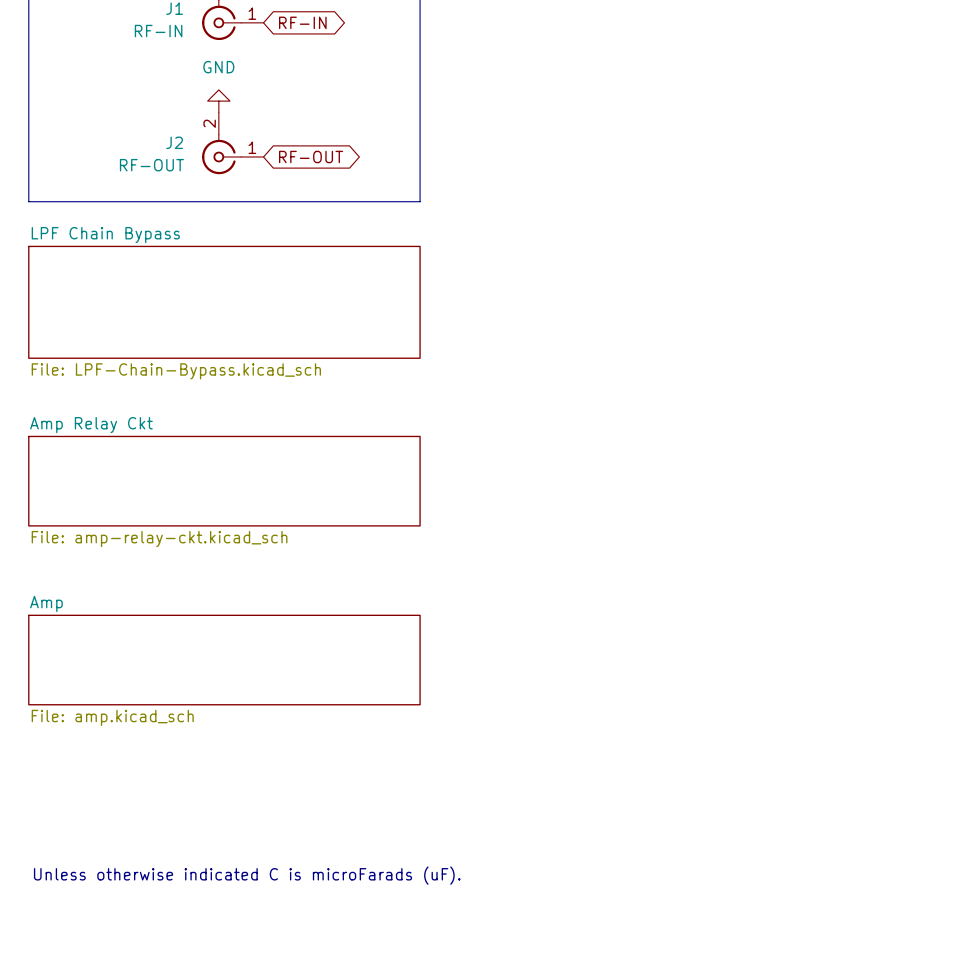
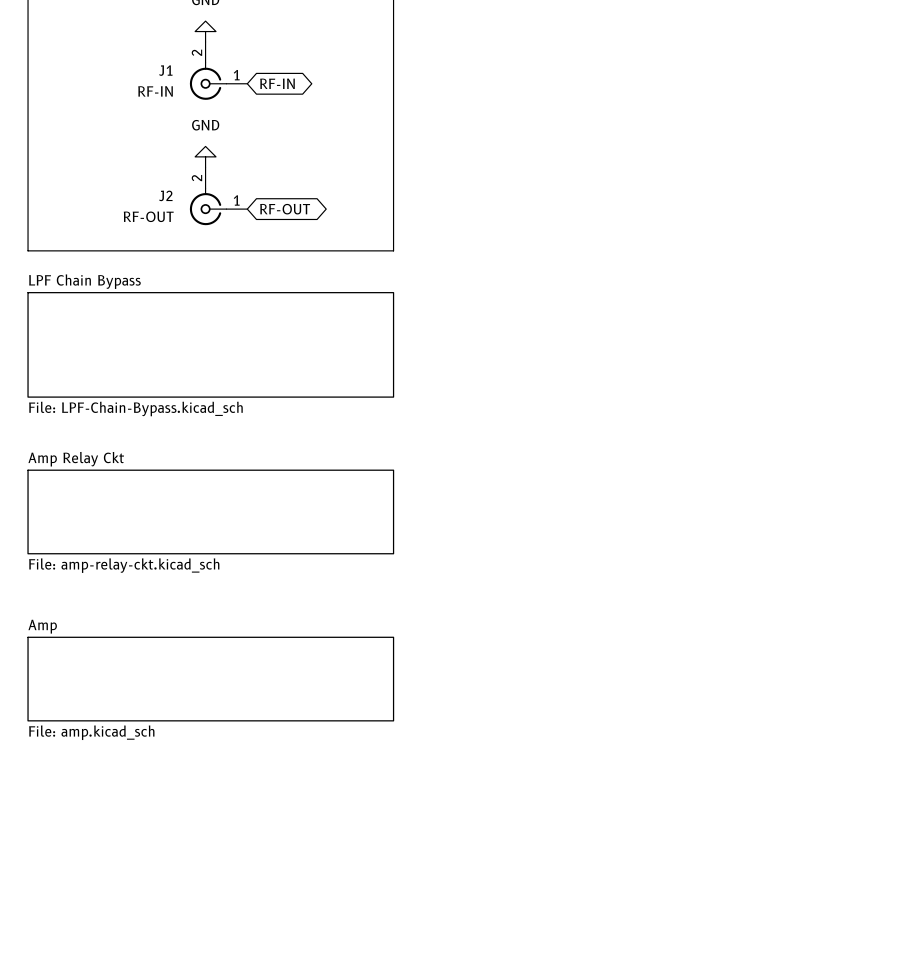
text: Unless otherwise indicated C is microFarads (uF). (247, 875) -> none

